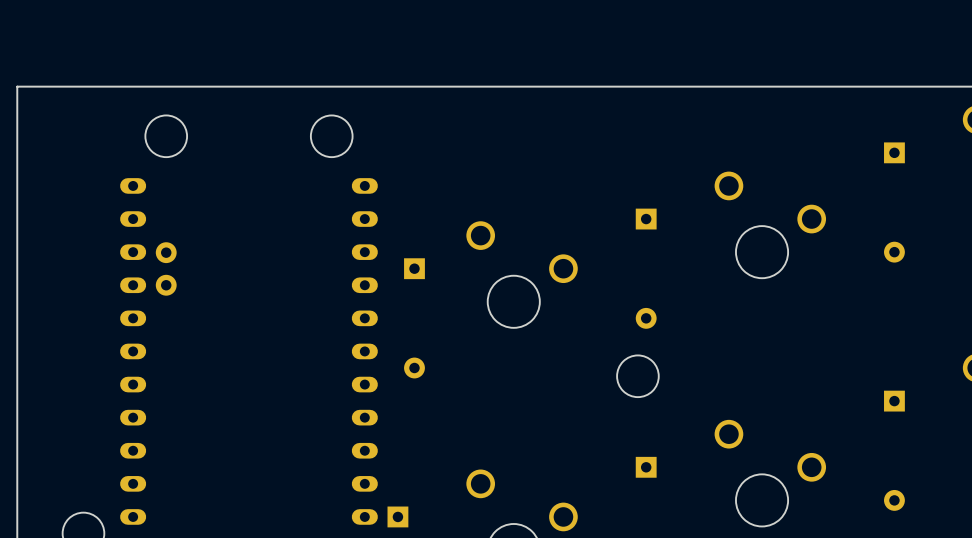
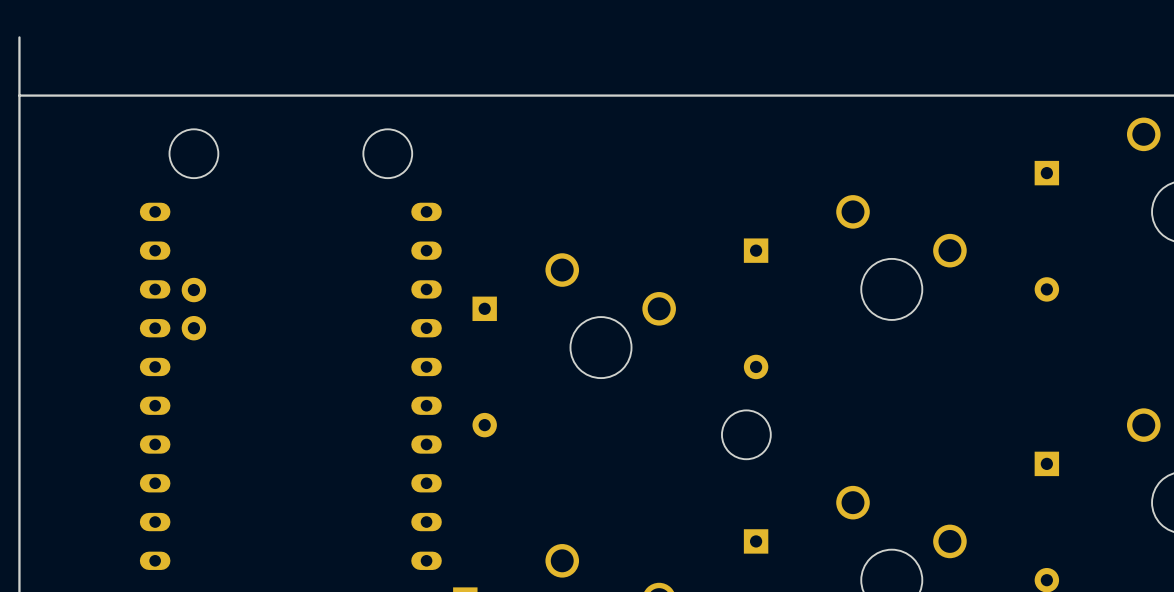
board edge: none -> (19, 37) (19, 95)

